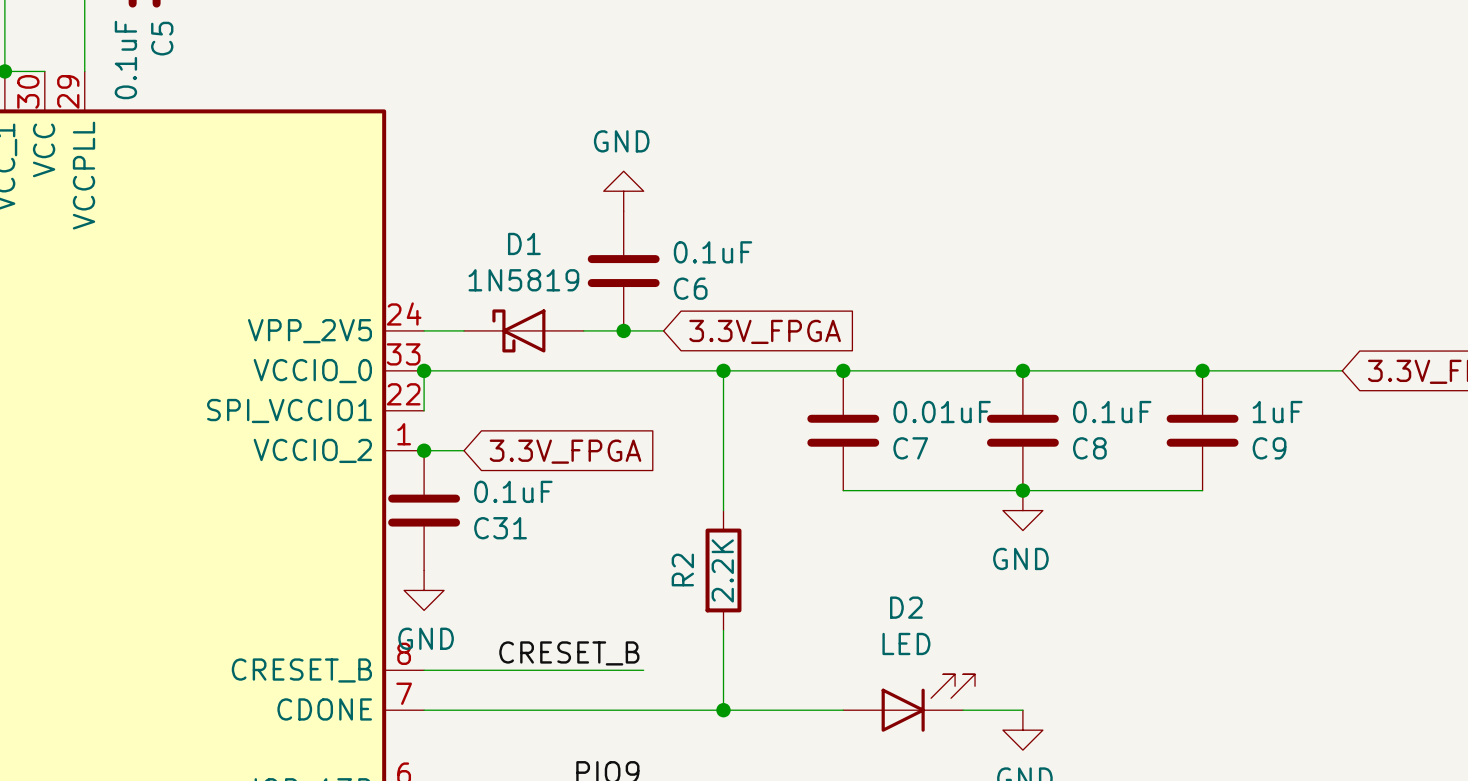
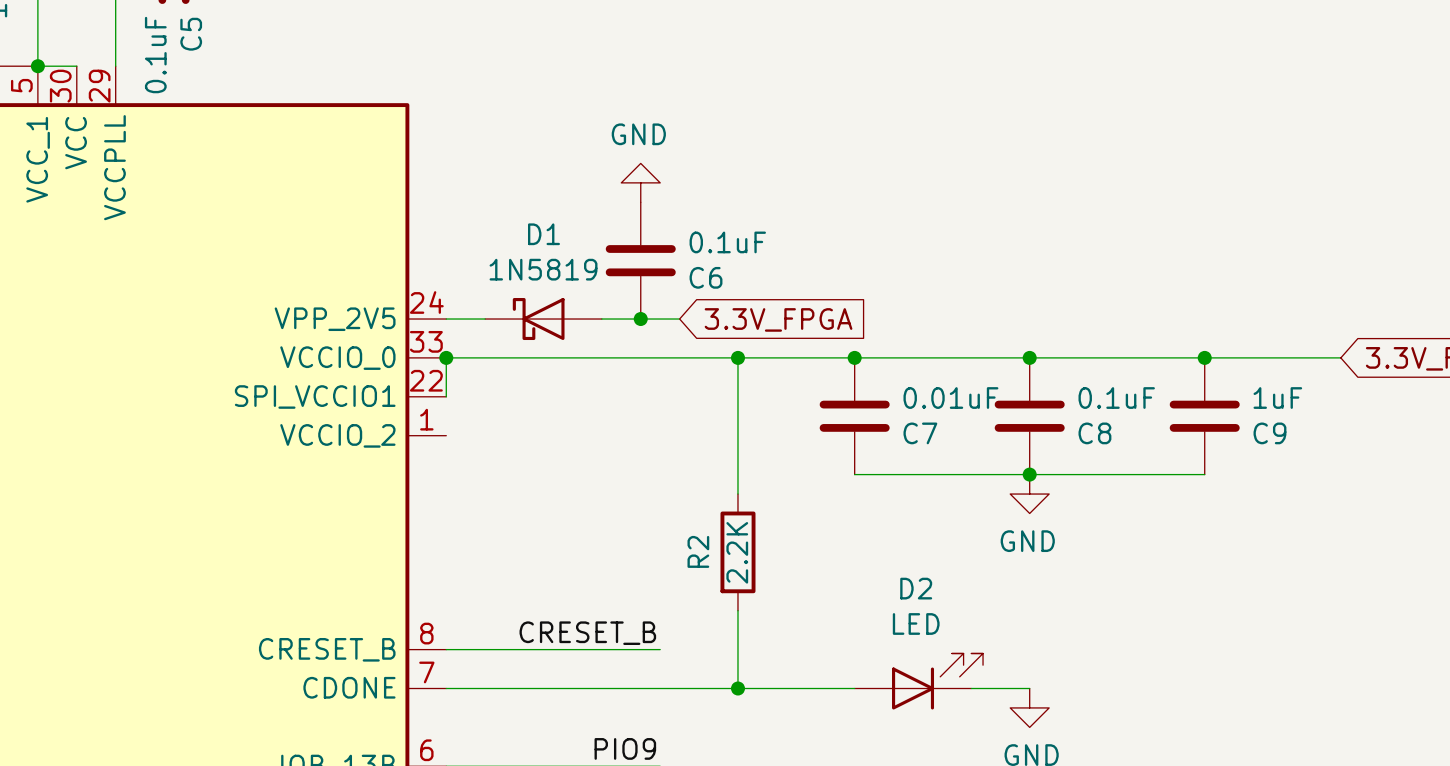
wire: (424, 450) (464, 450) -> none
junction: (424, 450) -> none
global label: 3.3V_FPGA (565, 451) -> none
C31: 0.1uF (424, 510) -> none
power symbol: GND (424, 590) -> none

